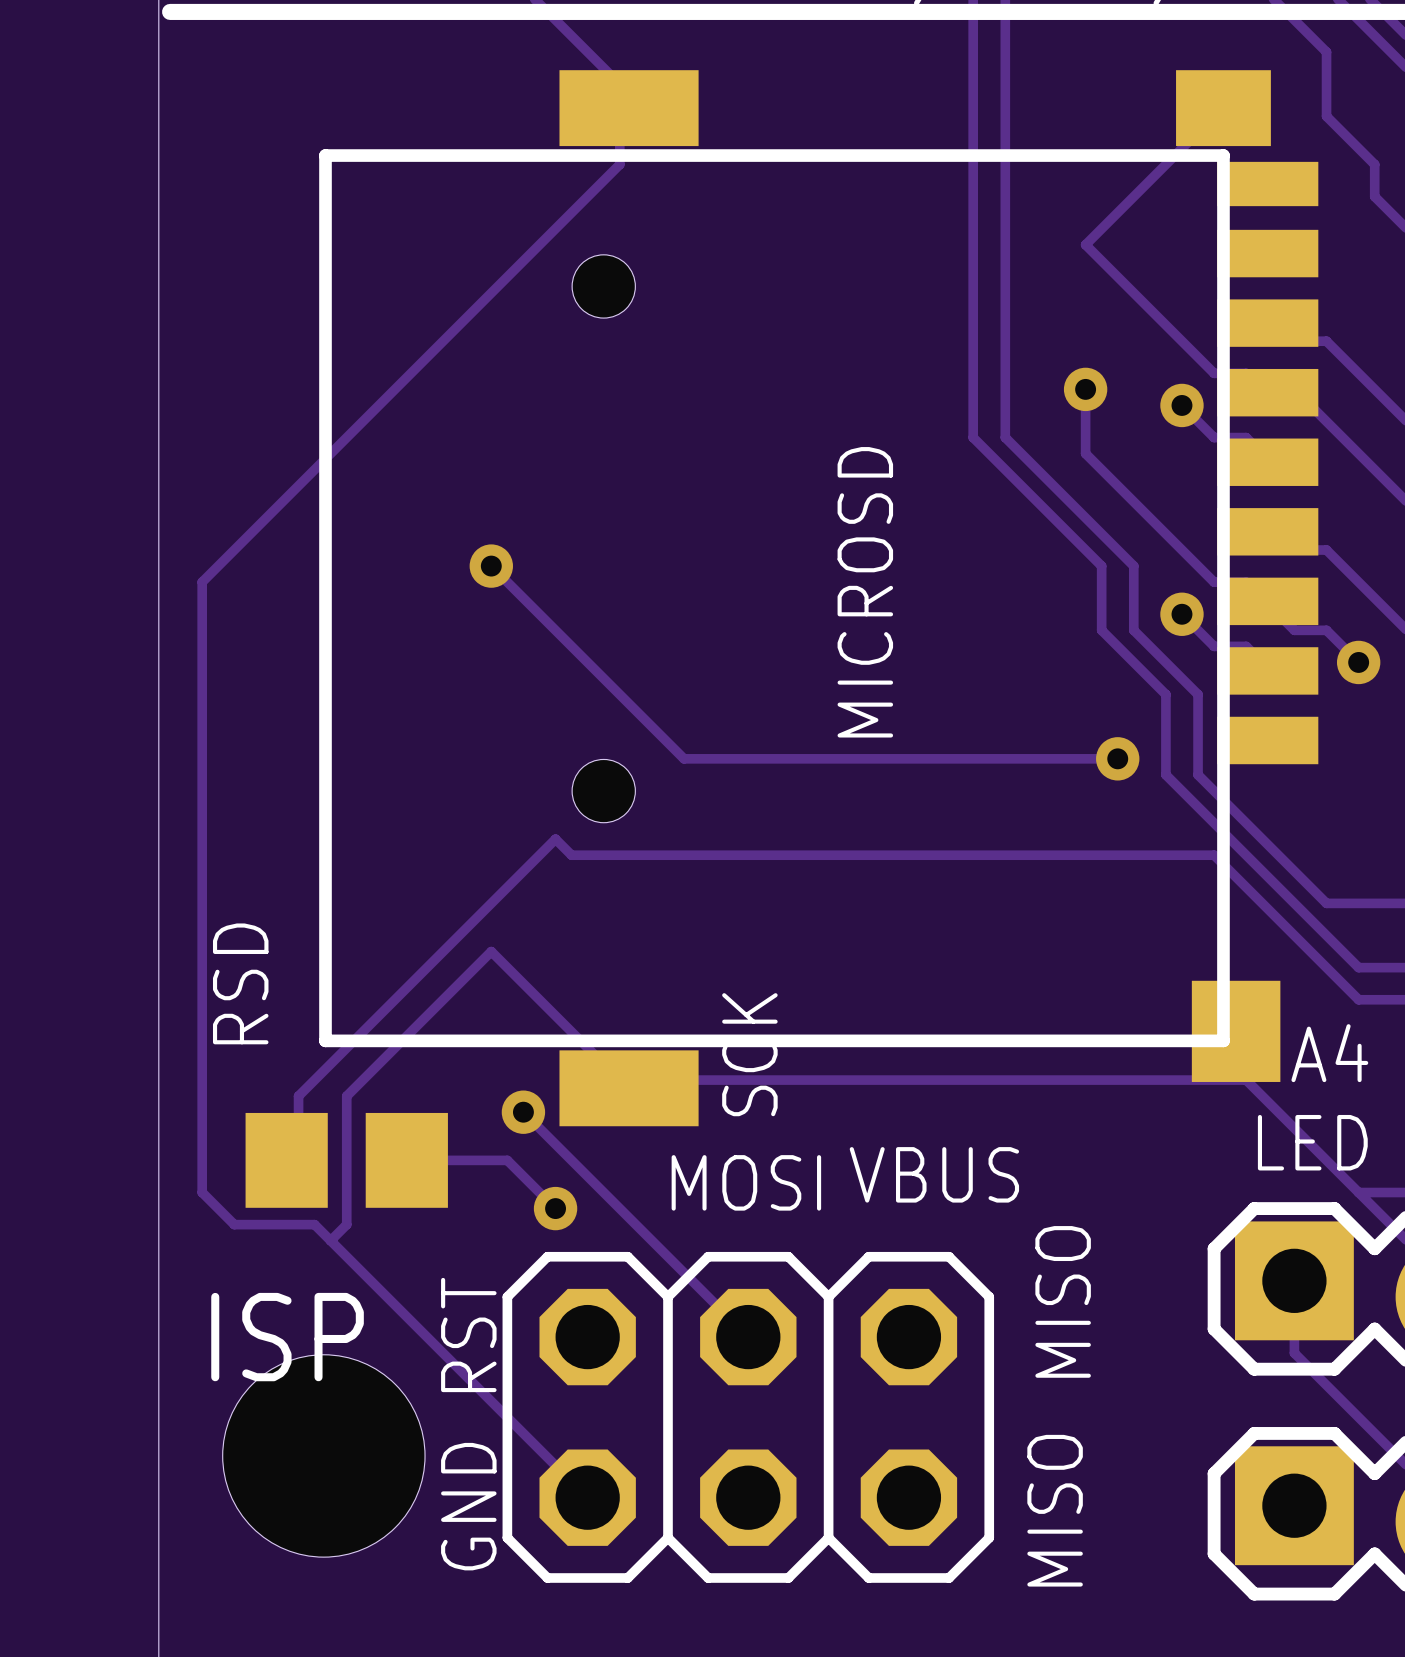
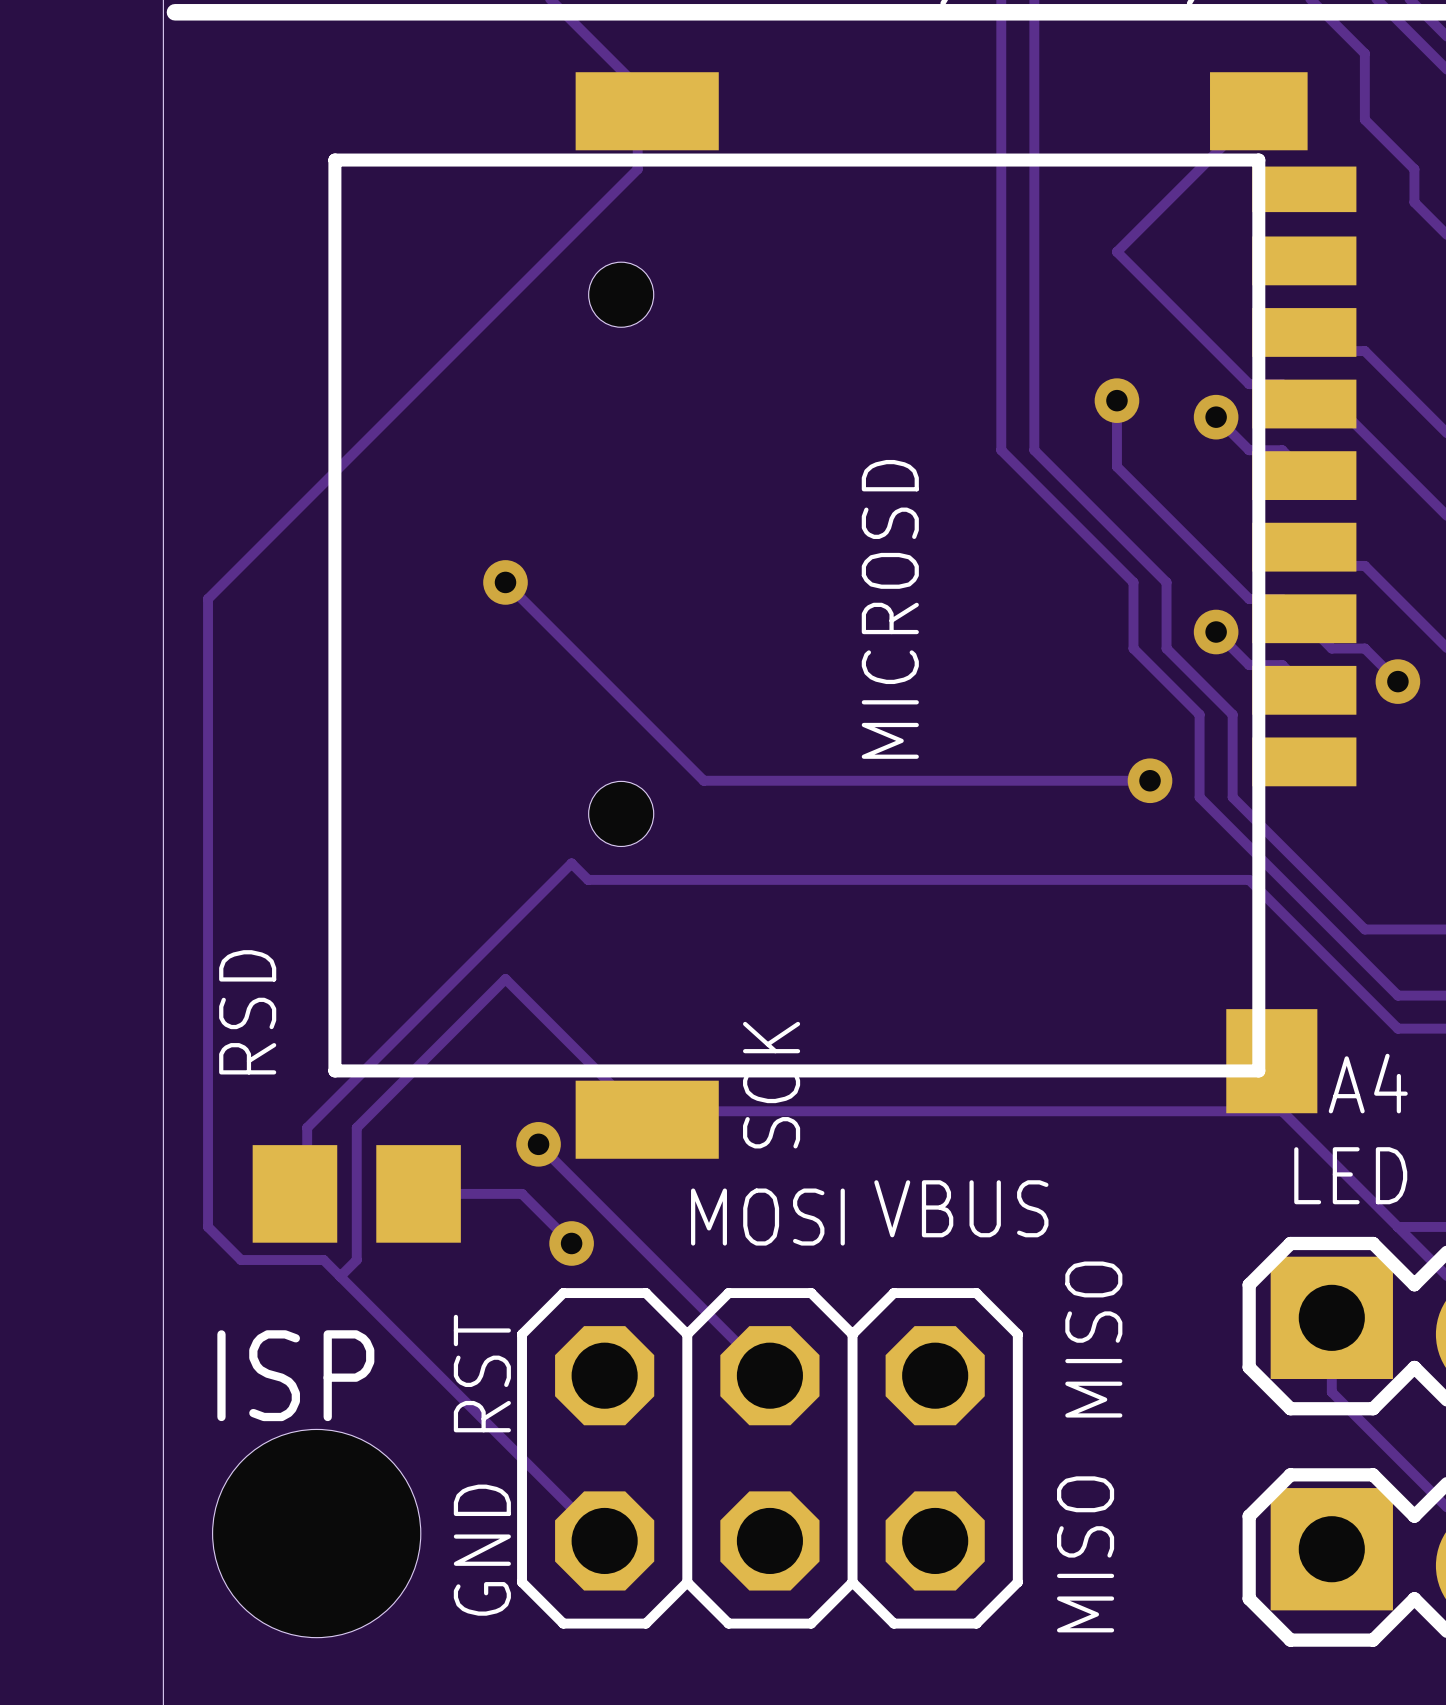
hole position: (323, 1455) -> (316, 1533)

